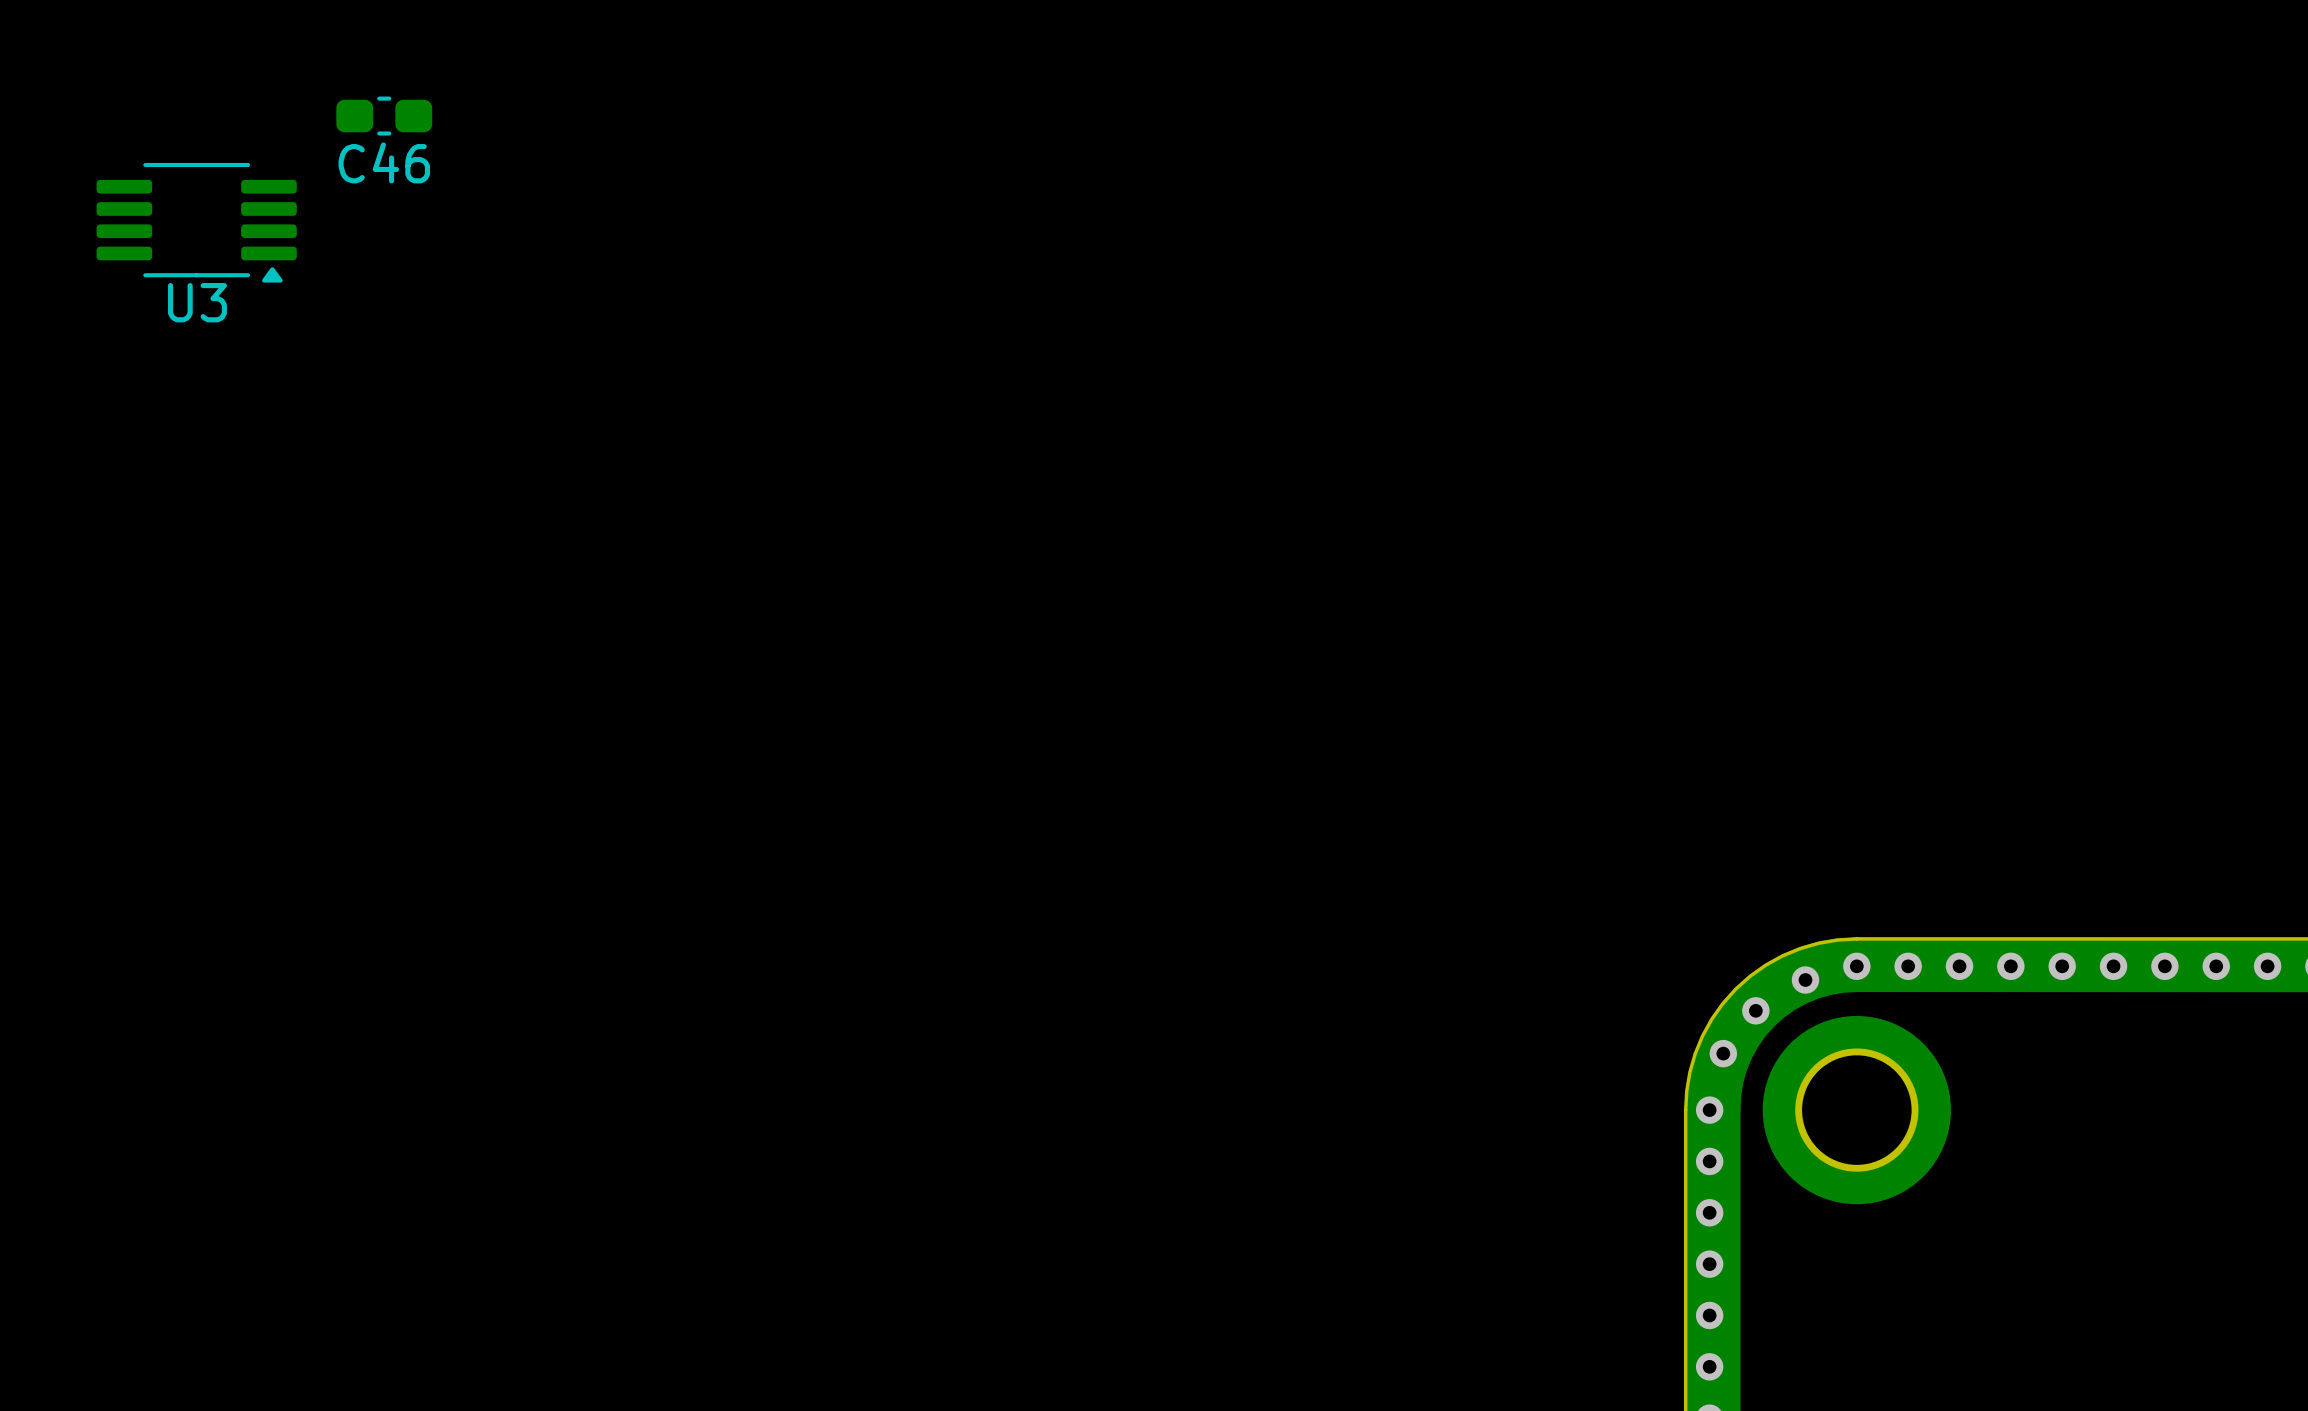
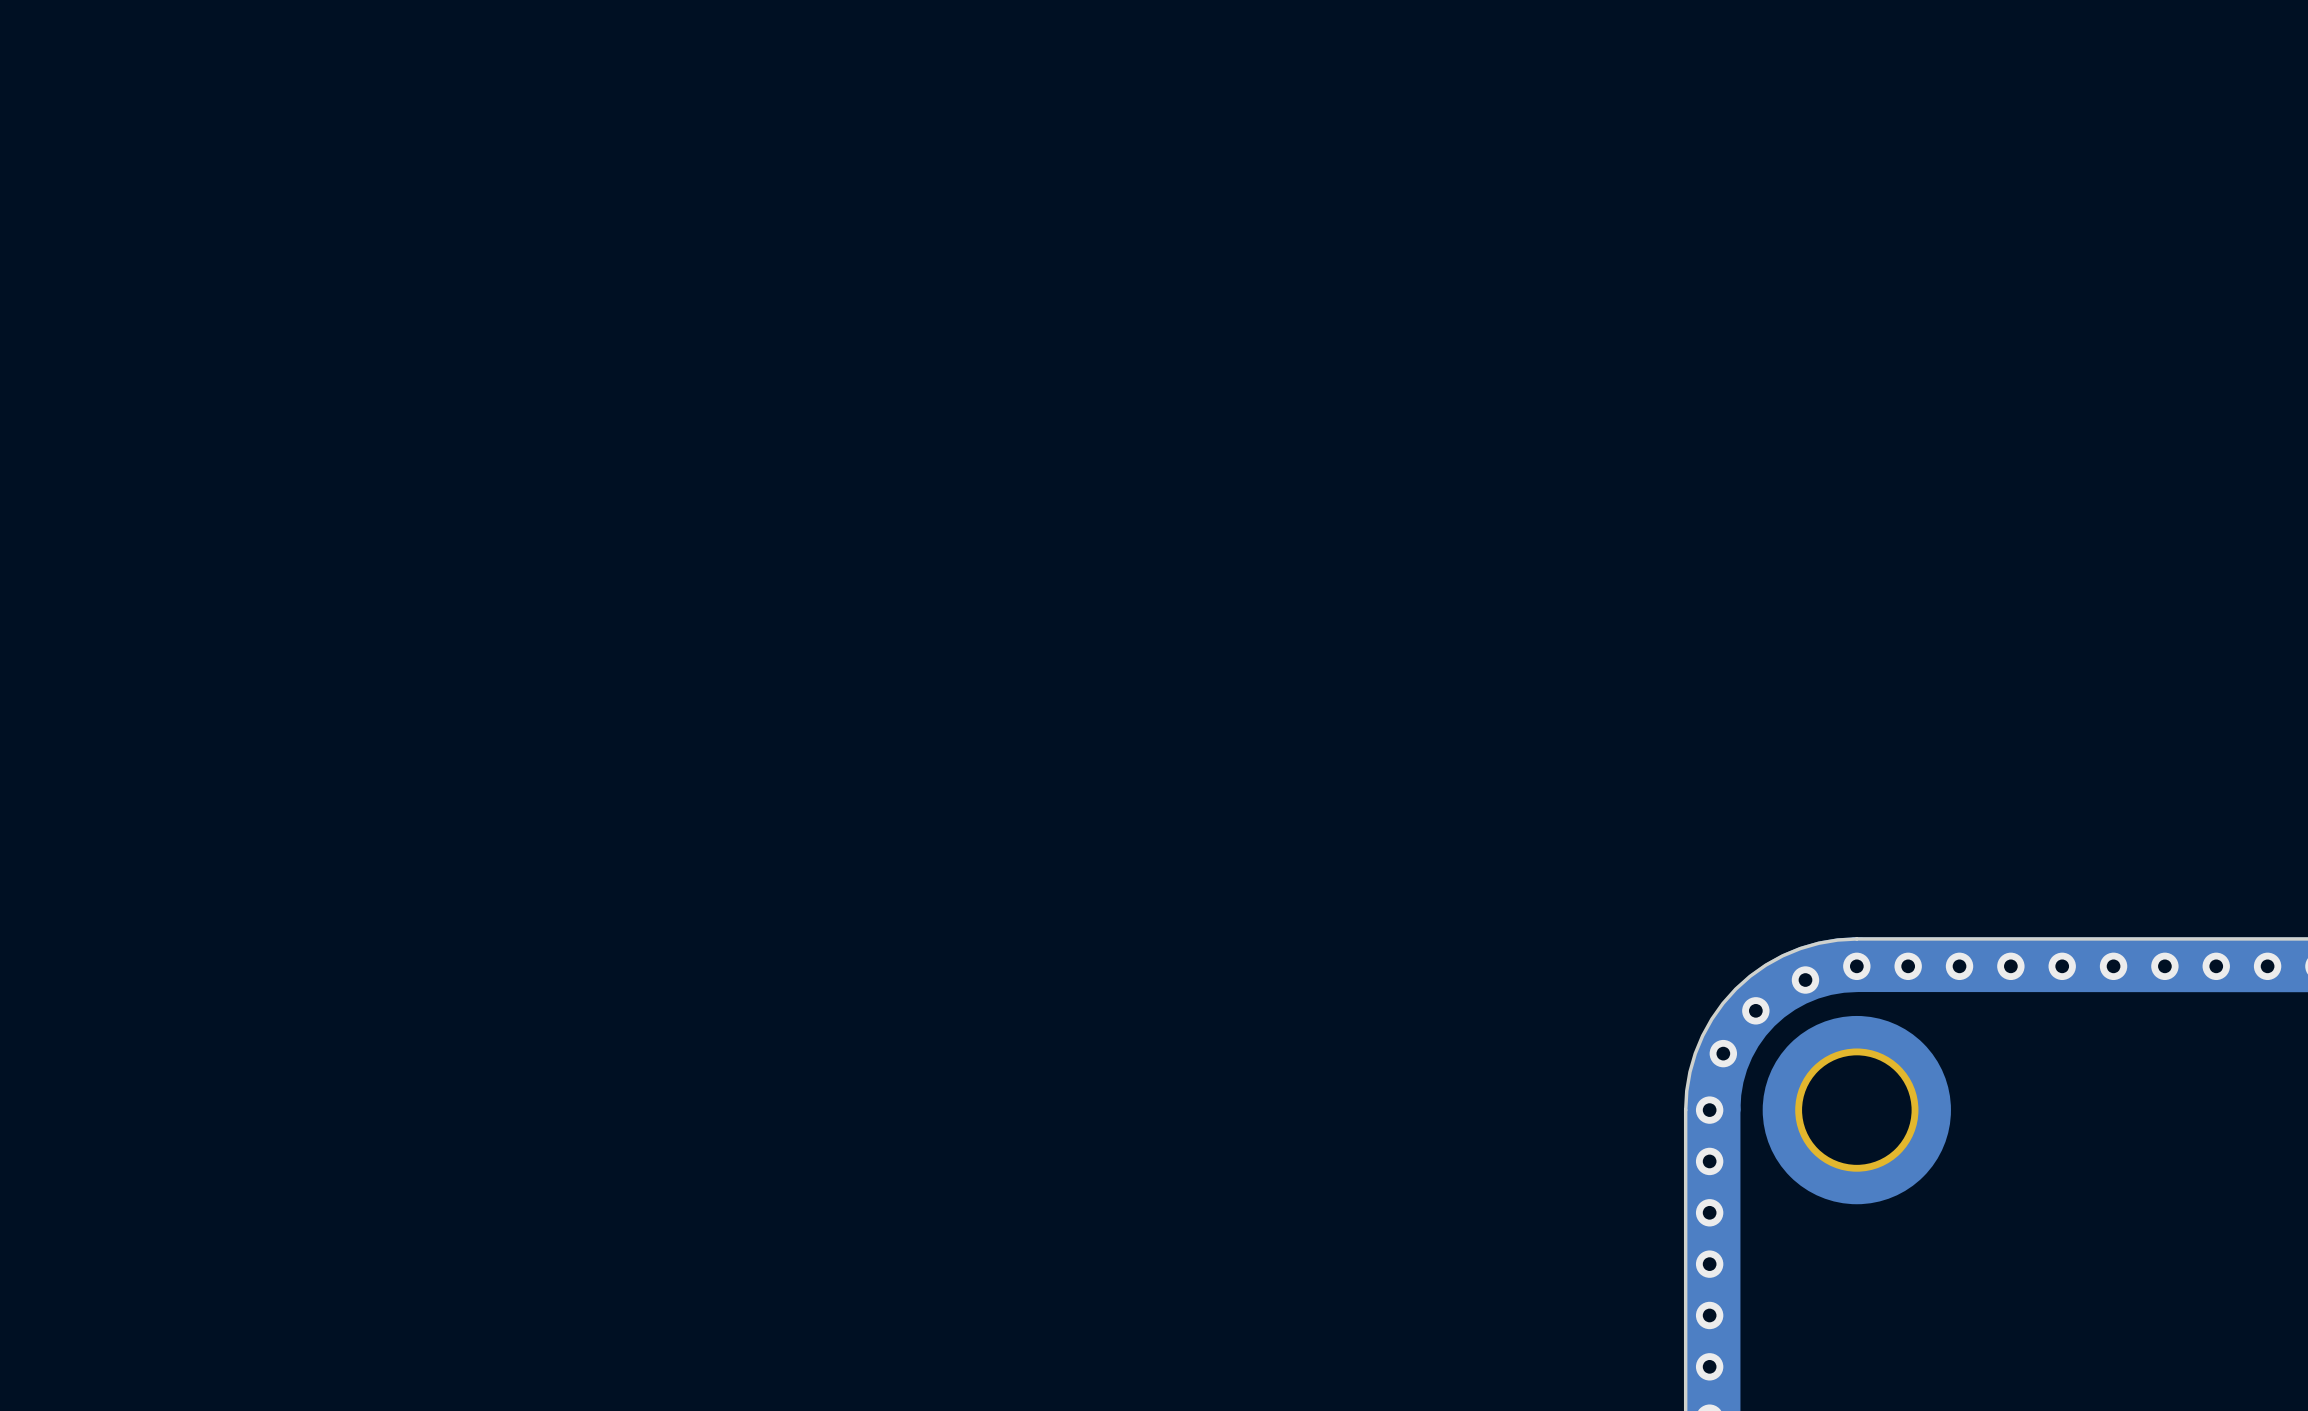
C46: (384, 116) -> none
U3: (196, 222) -> none

